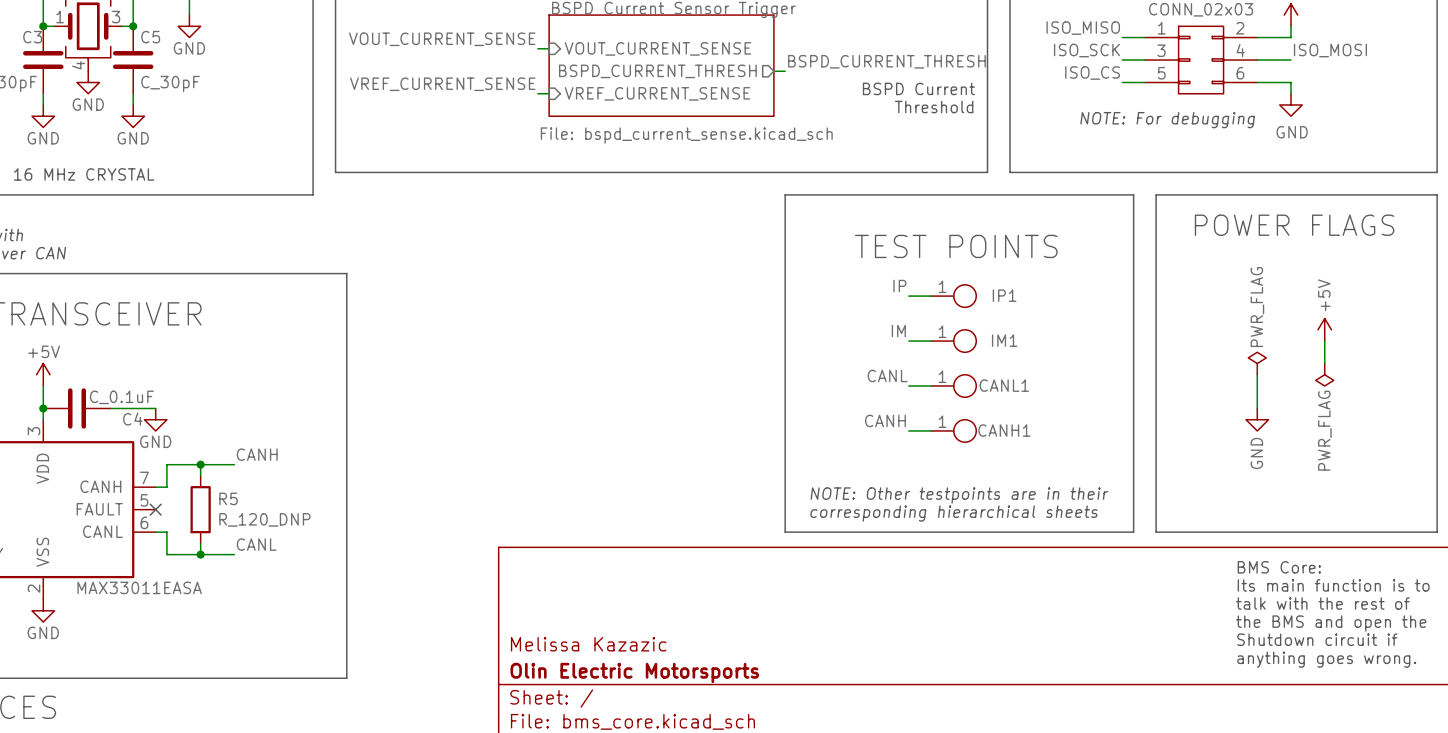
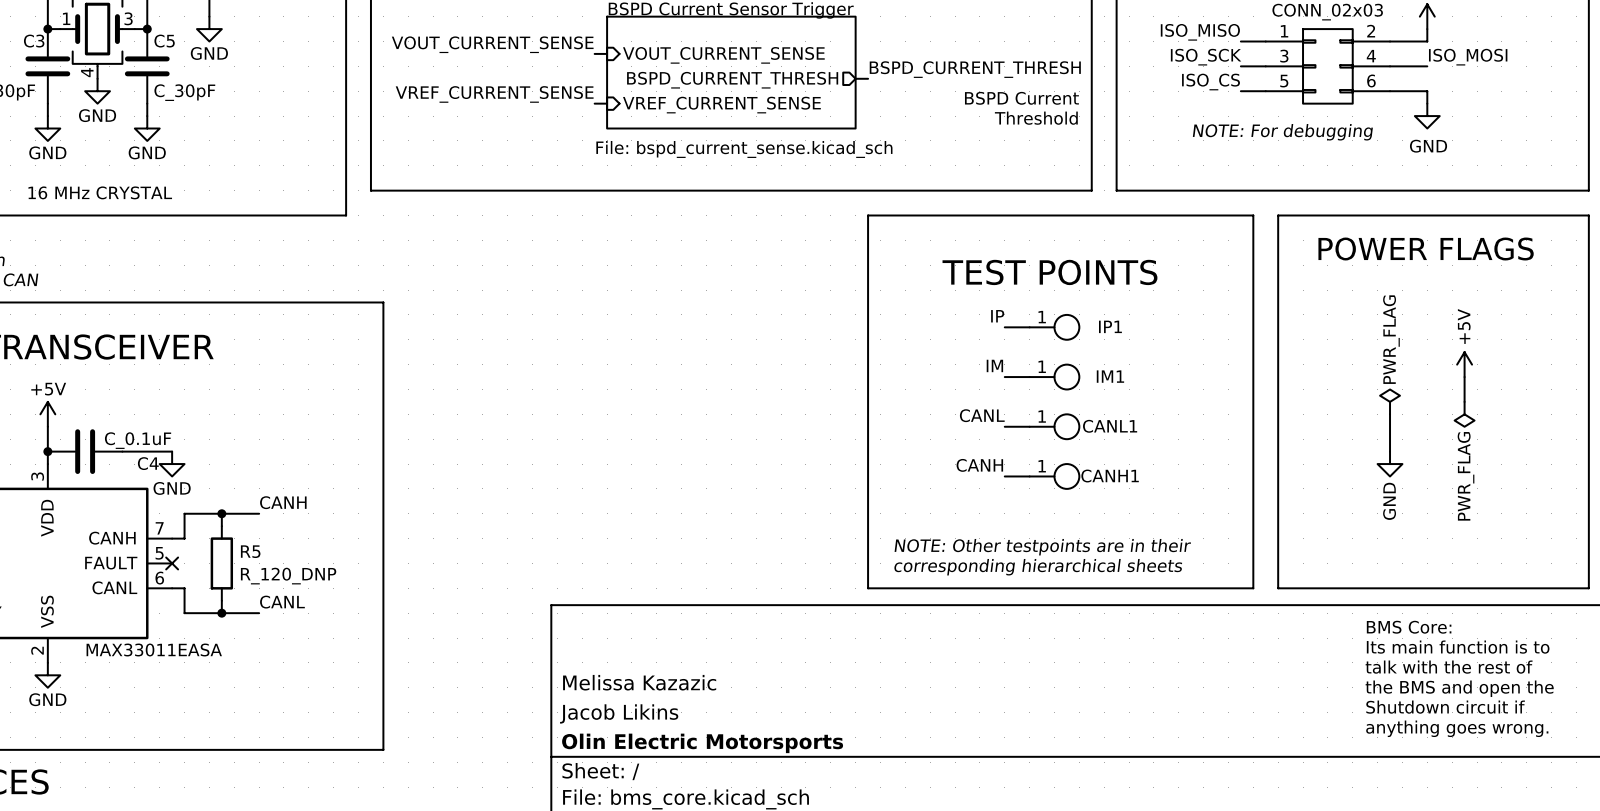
title block: none -> Melissa Kazazic (639, 682)
title block: Melissa Kazazic (588, 644) -> Jacob Likins (619, 713)

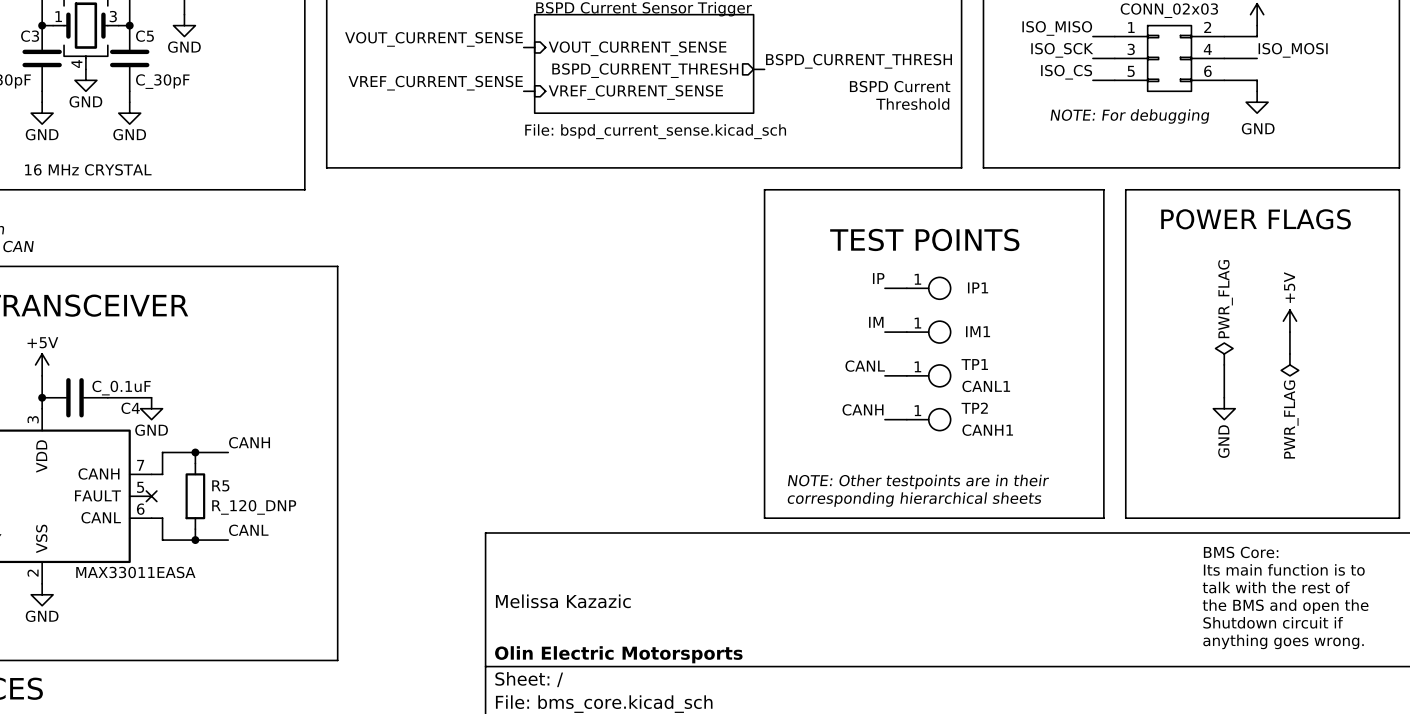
CANL1 name: CANL1 (1110, 426) -> TP1 (974, 364)
CANL1 value: none -> CANL1 (986, 386)
CANH1 name: CANH1 (1110, 476) -> TP2 (974, 408)
CANH1 value: none -> CANH1 (987, 430)
title block: Jacob Likins (619, 713) -> none

